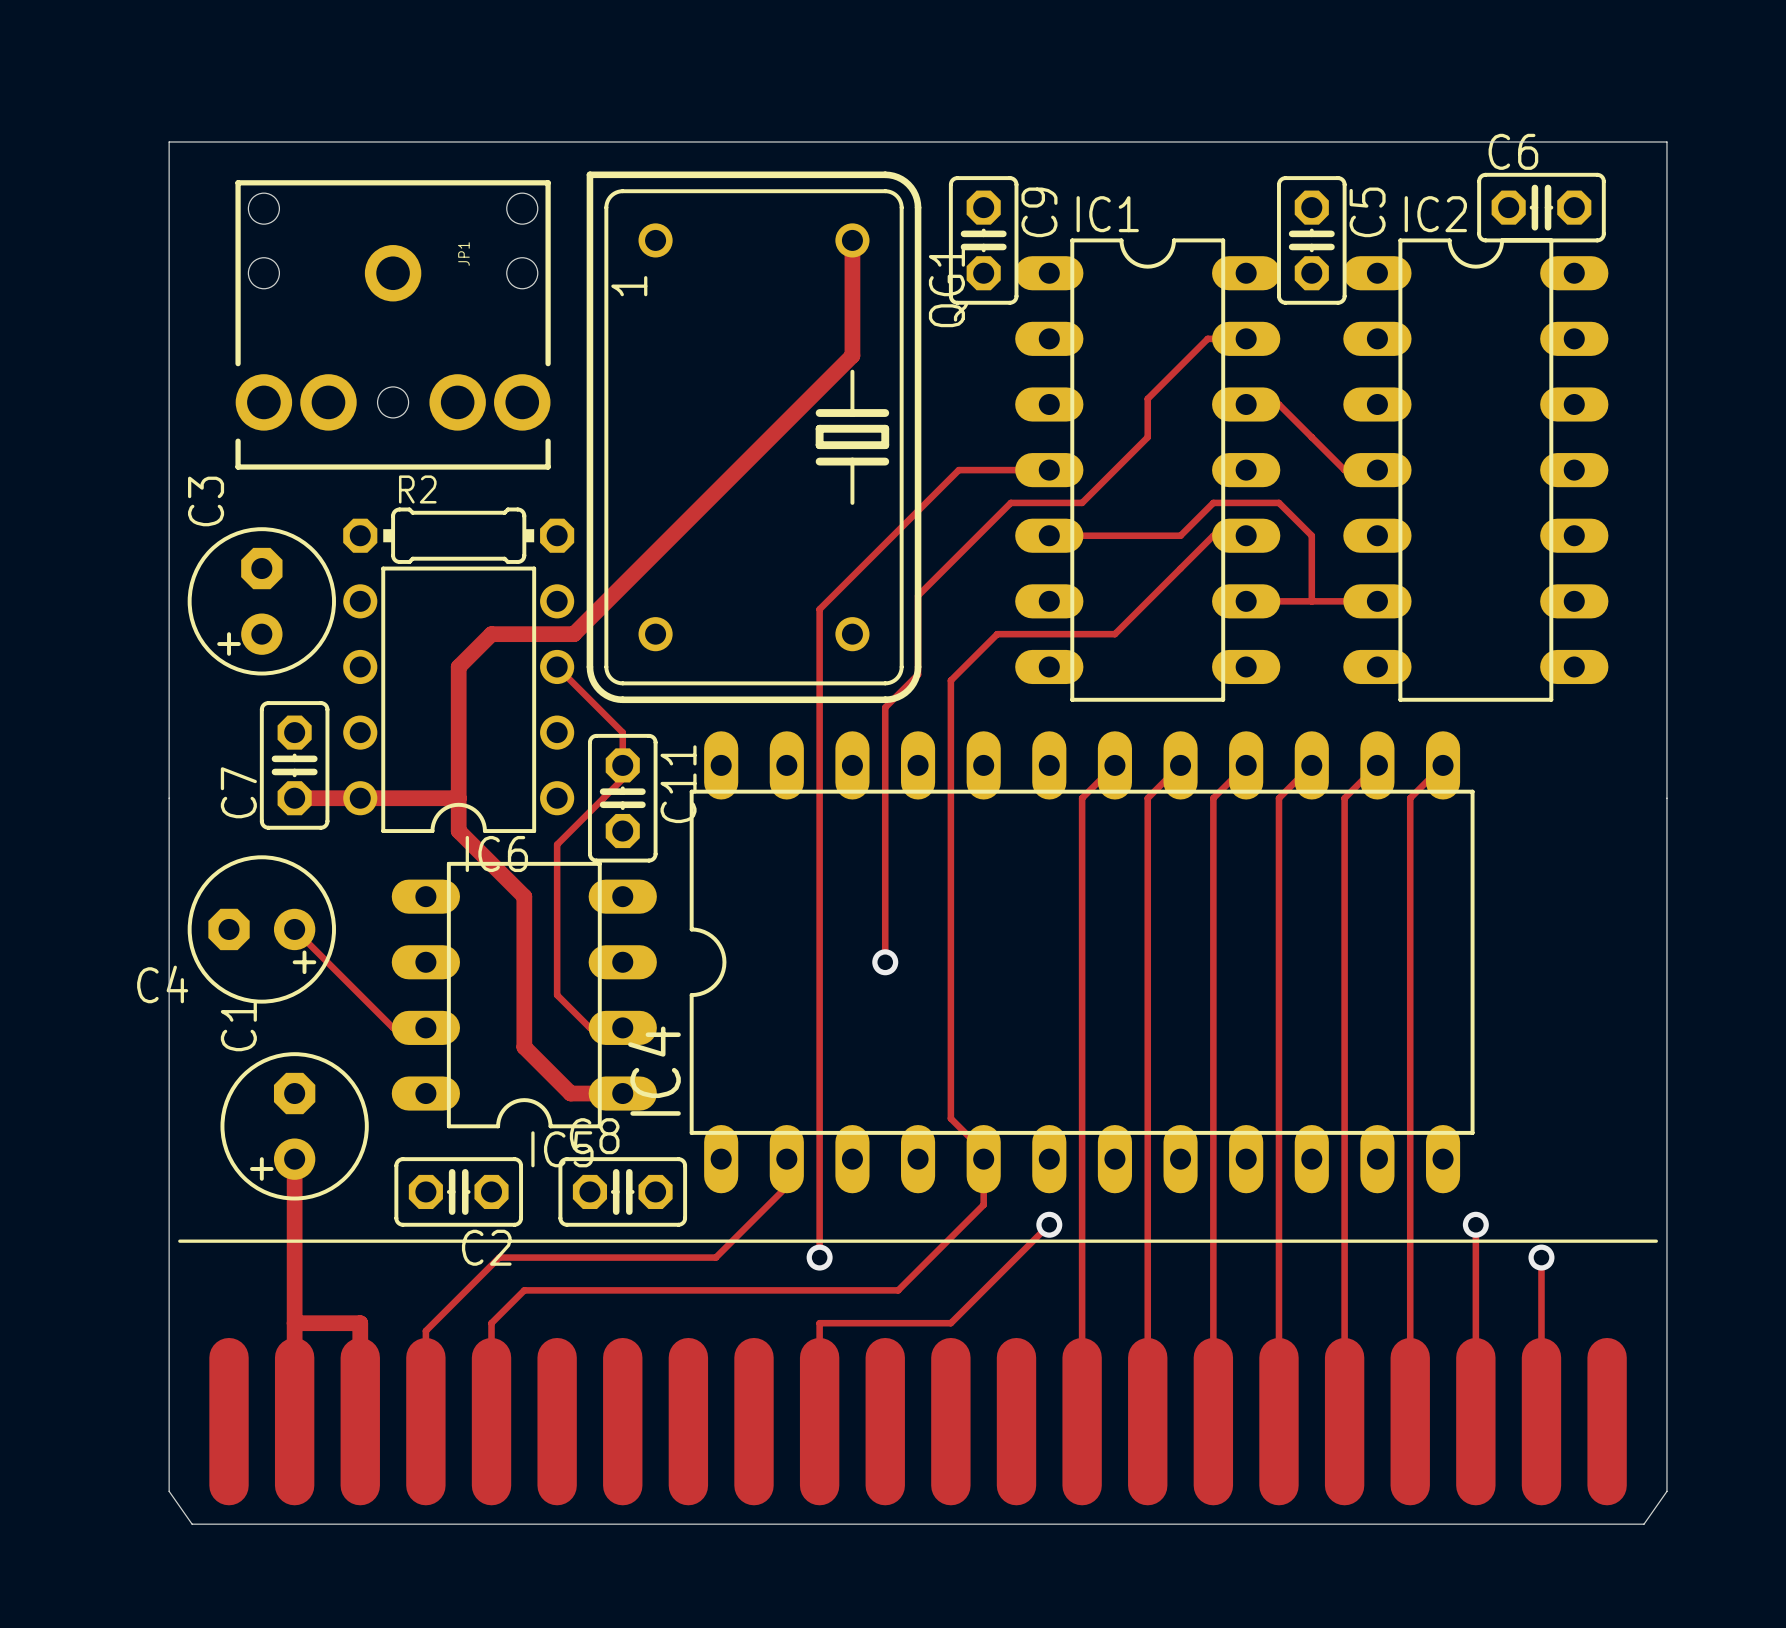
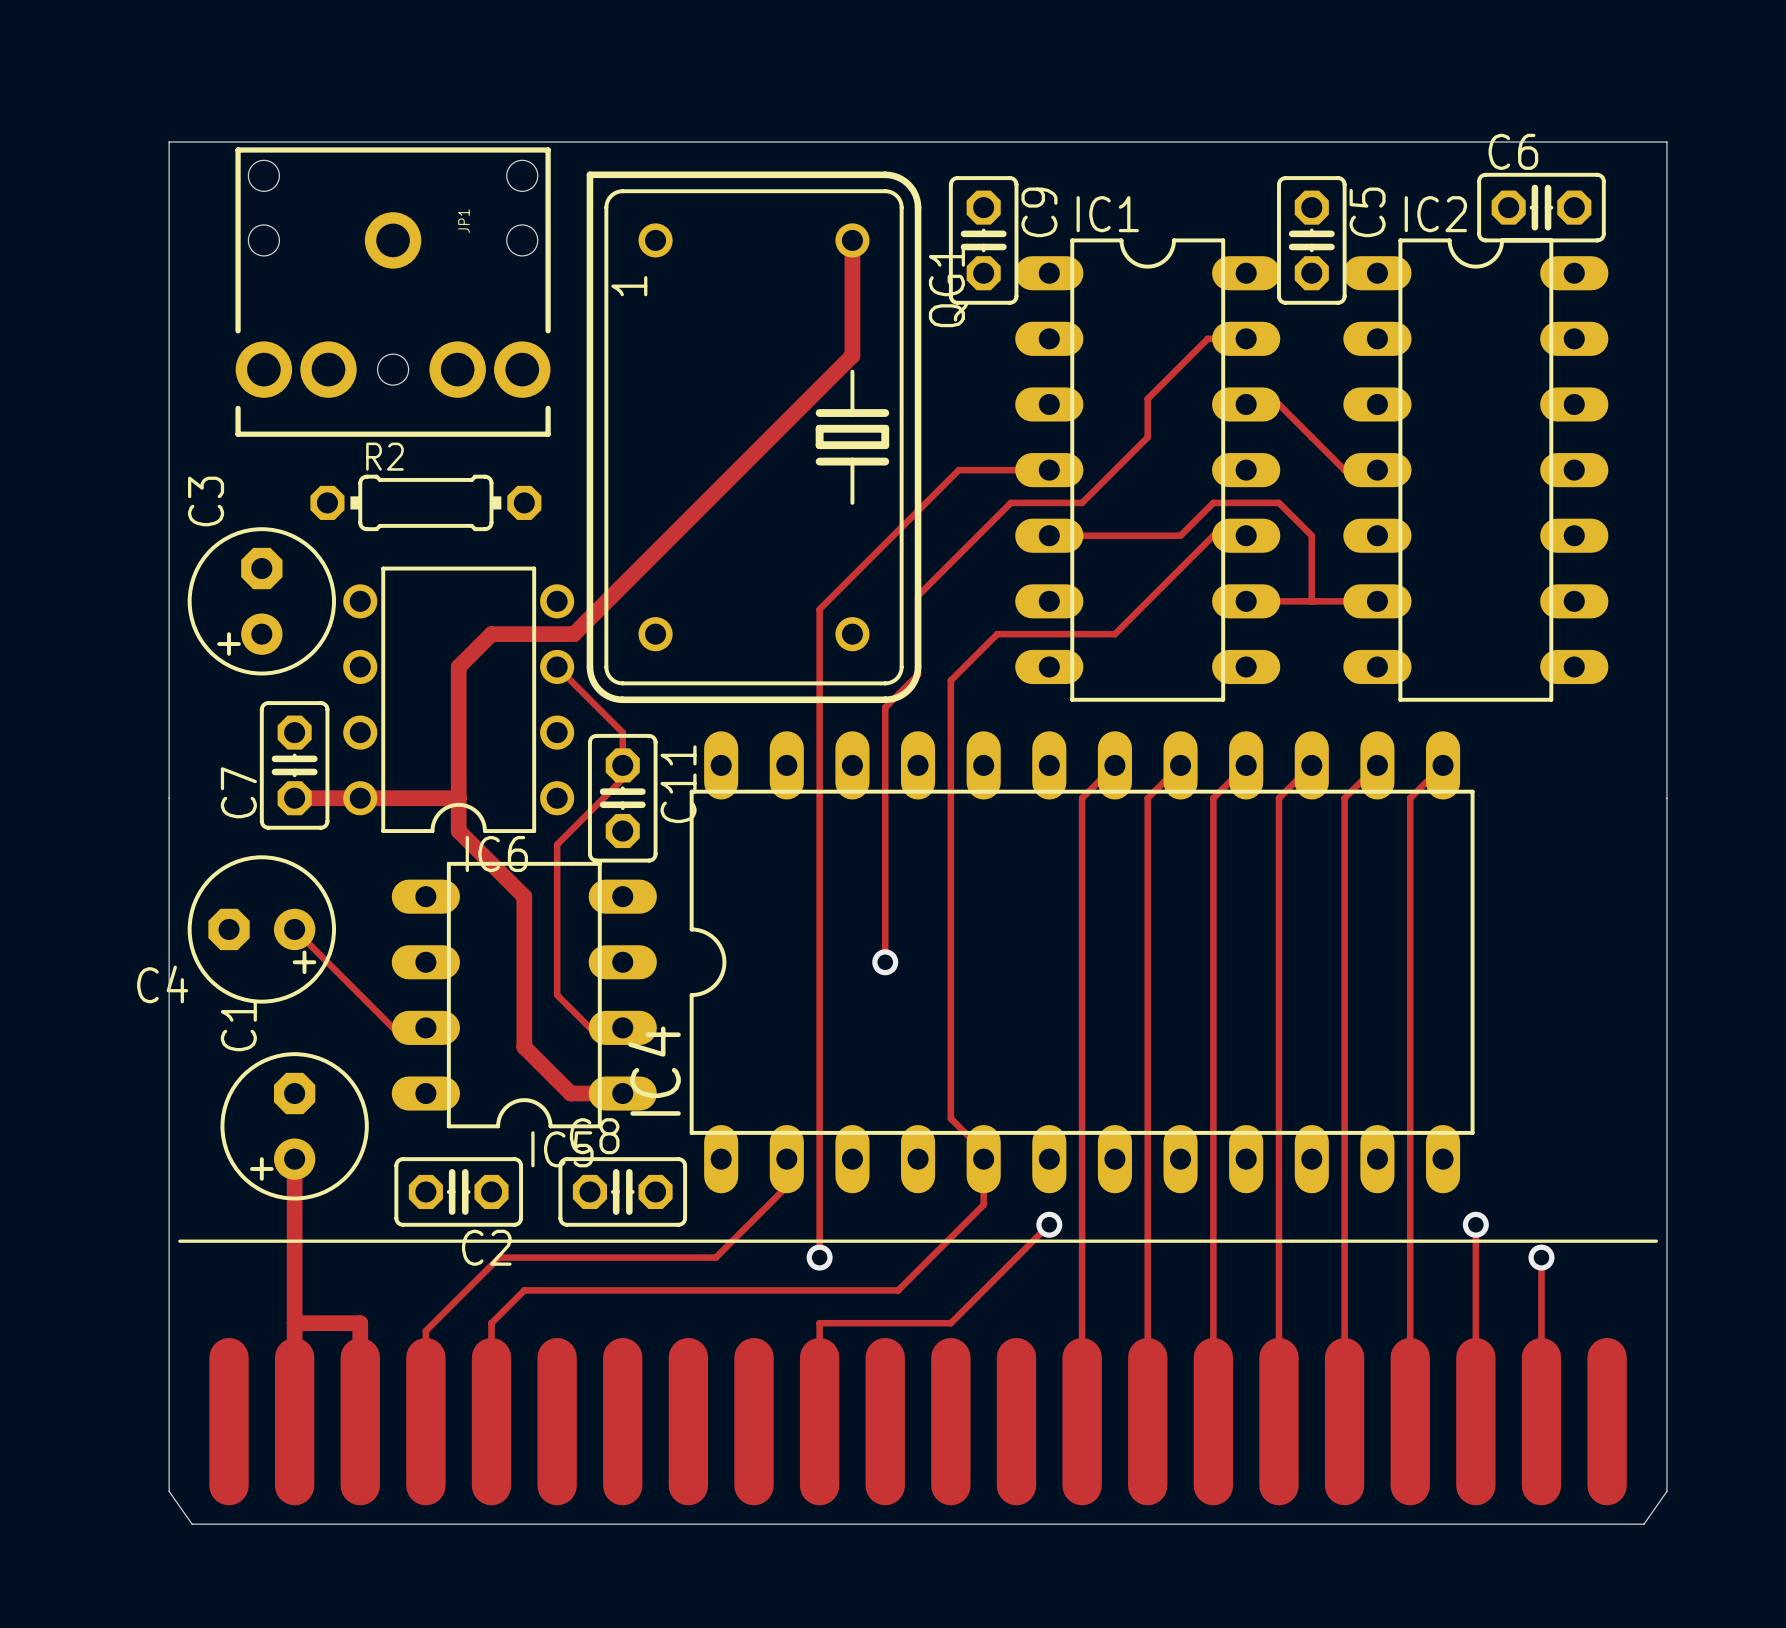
JP1 position: (393, 324) -> (393, 292)
R2 position: (458, 535) -> (425, 502)

